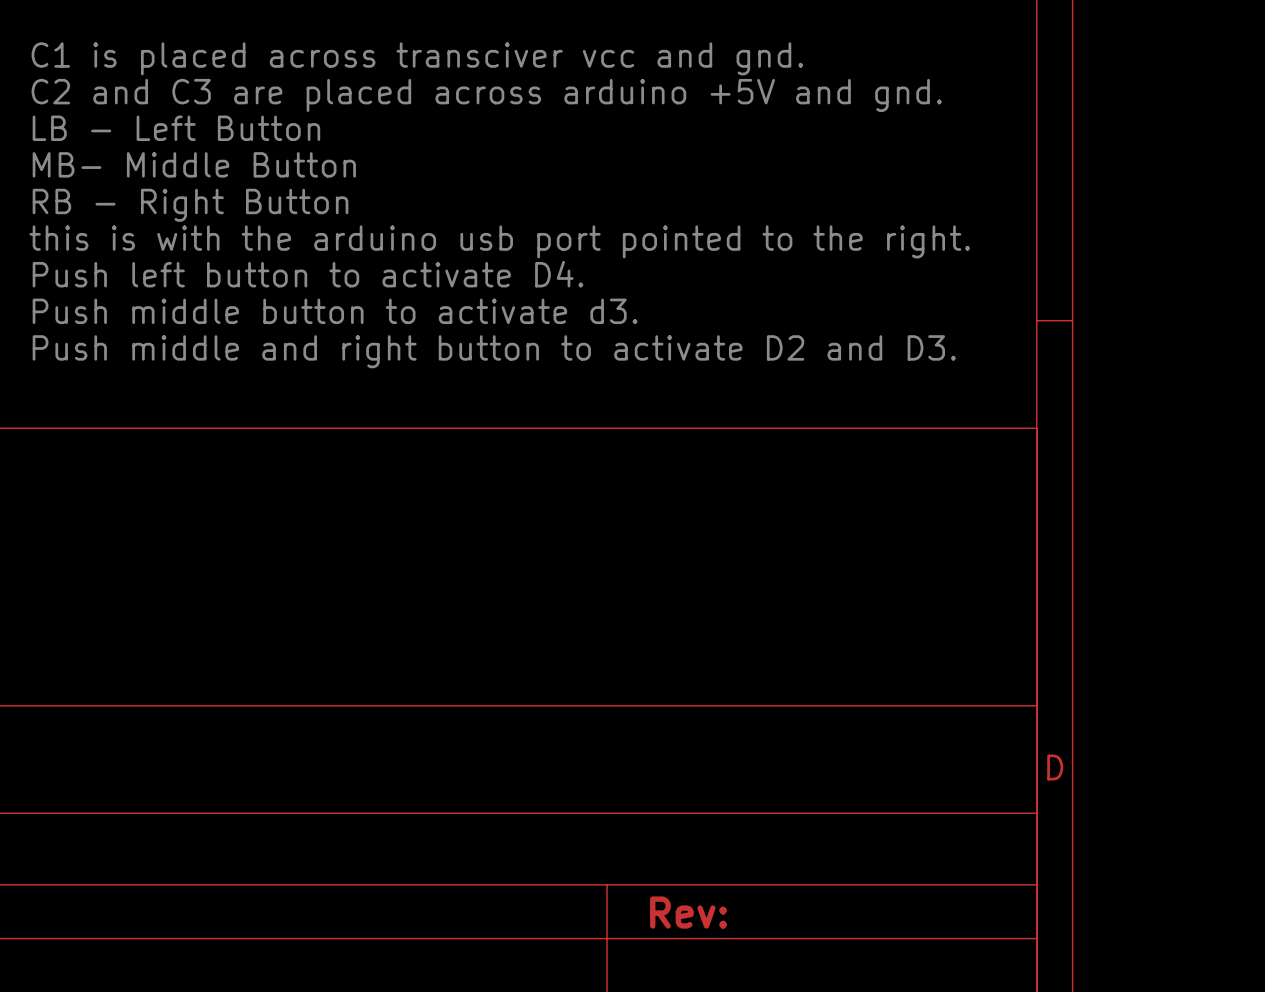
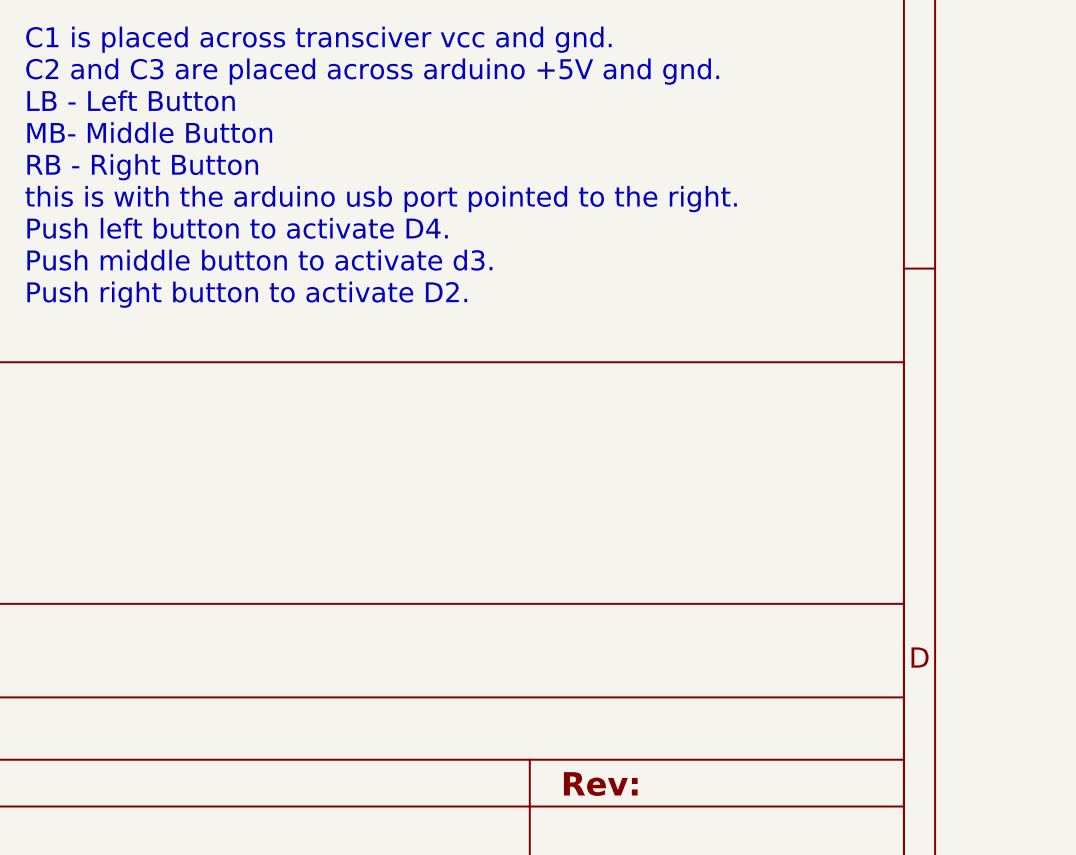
text: Push middle and right button to activate D2 and D3. (494, 351) -> Push right button to activate D2. (247, 294)

